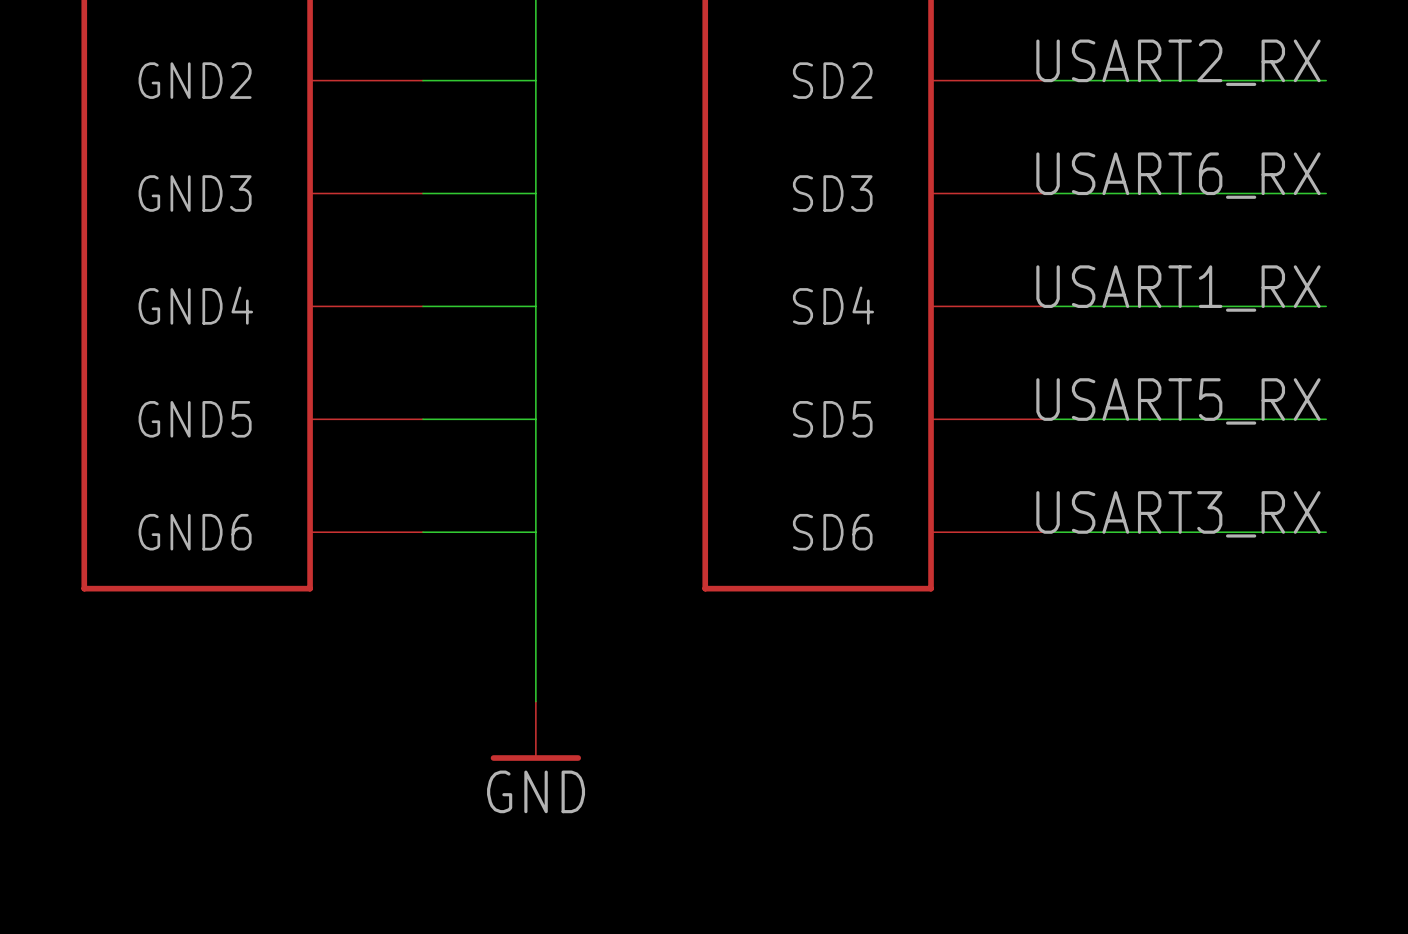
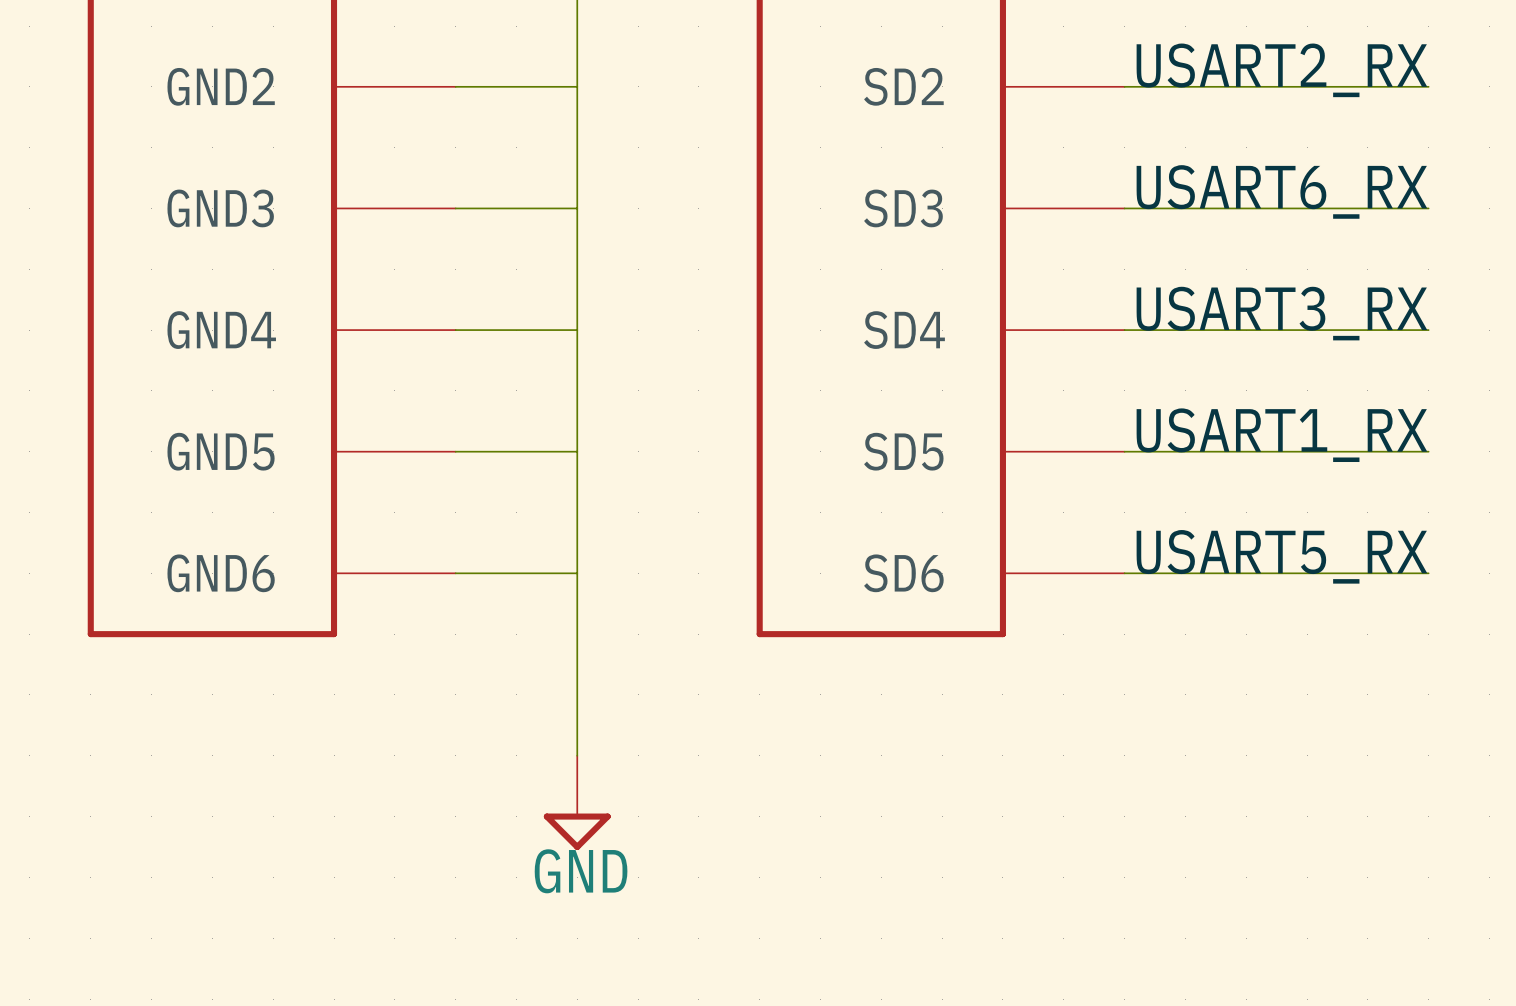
label: USART1_RX (1178, 288) -> USART3_RX (1281, 313)
label: USART5_RX (1178, 401) -> USART1_RX (1281, 435)
label: USART3_RX (1178, 514) -> USART5_RX (1281, 556)
power symbol shape: [490, 701, 582, 761] -> [543, 755, 611, 851]

